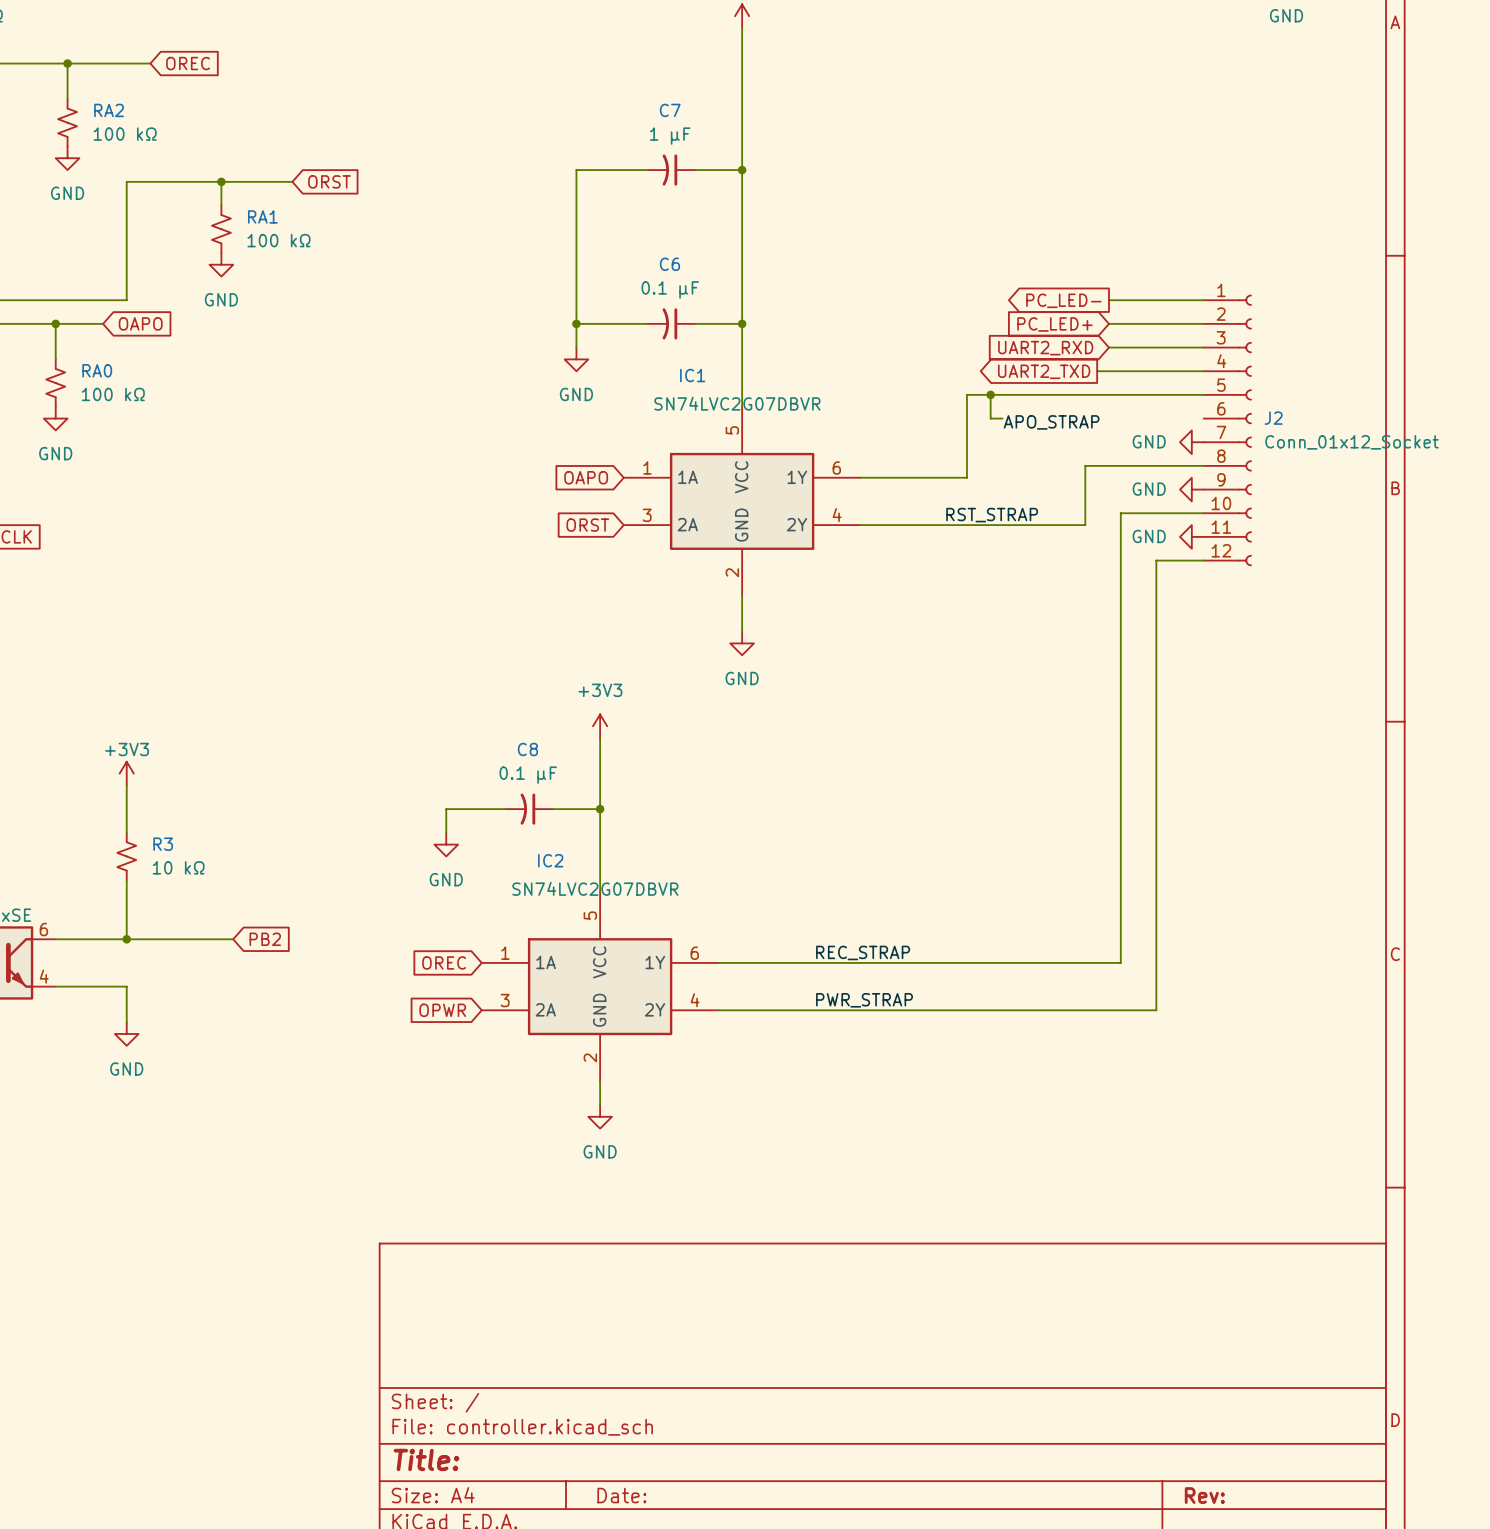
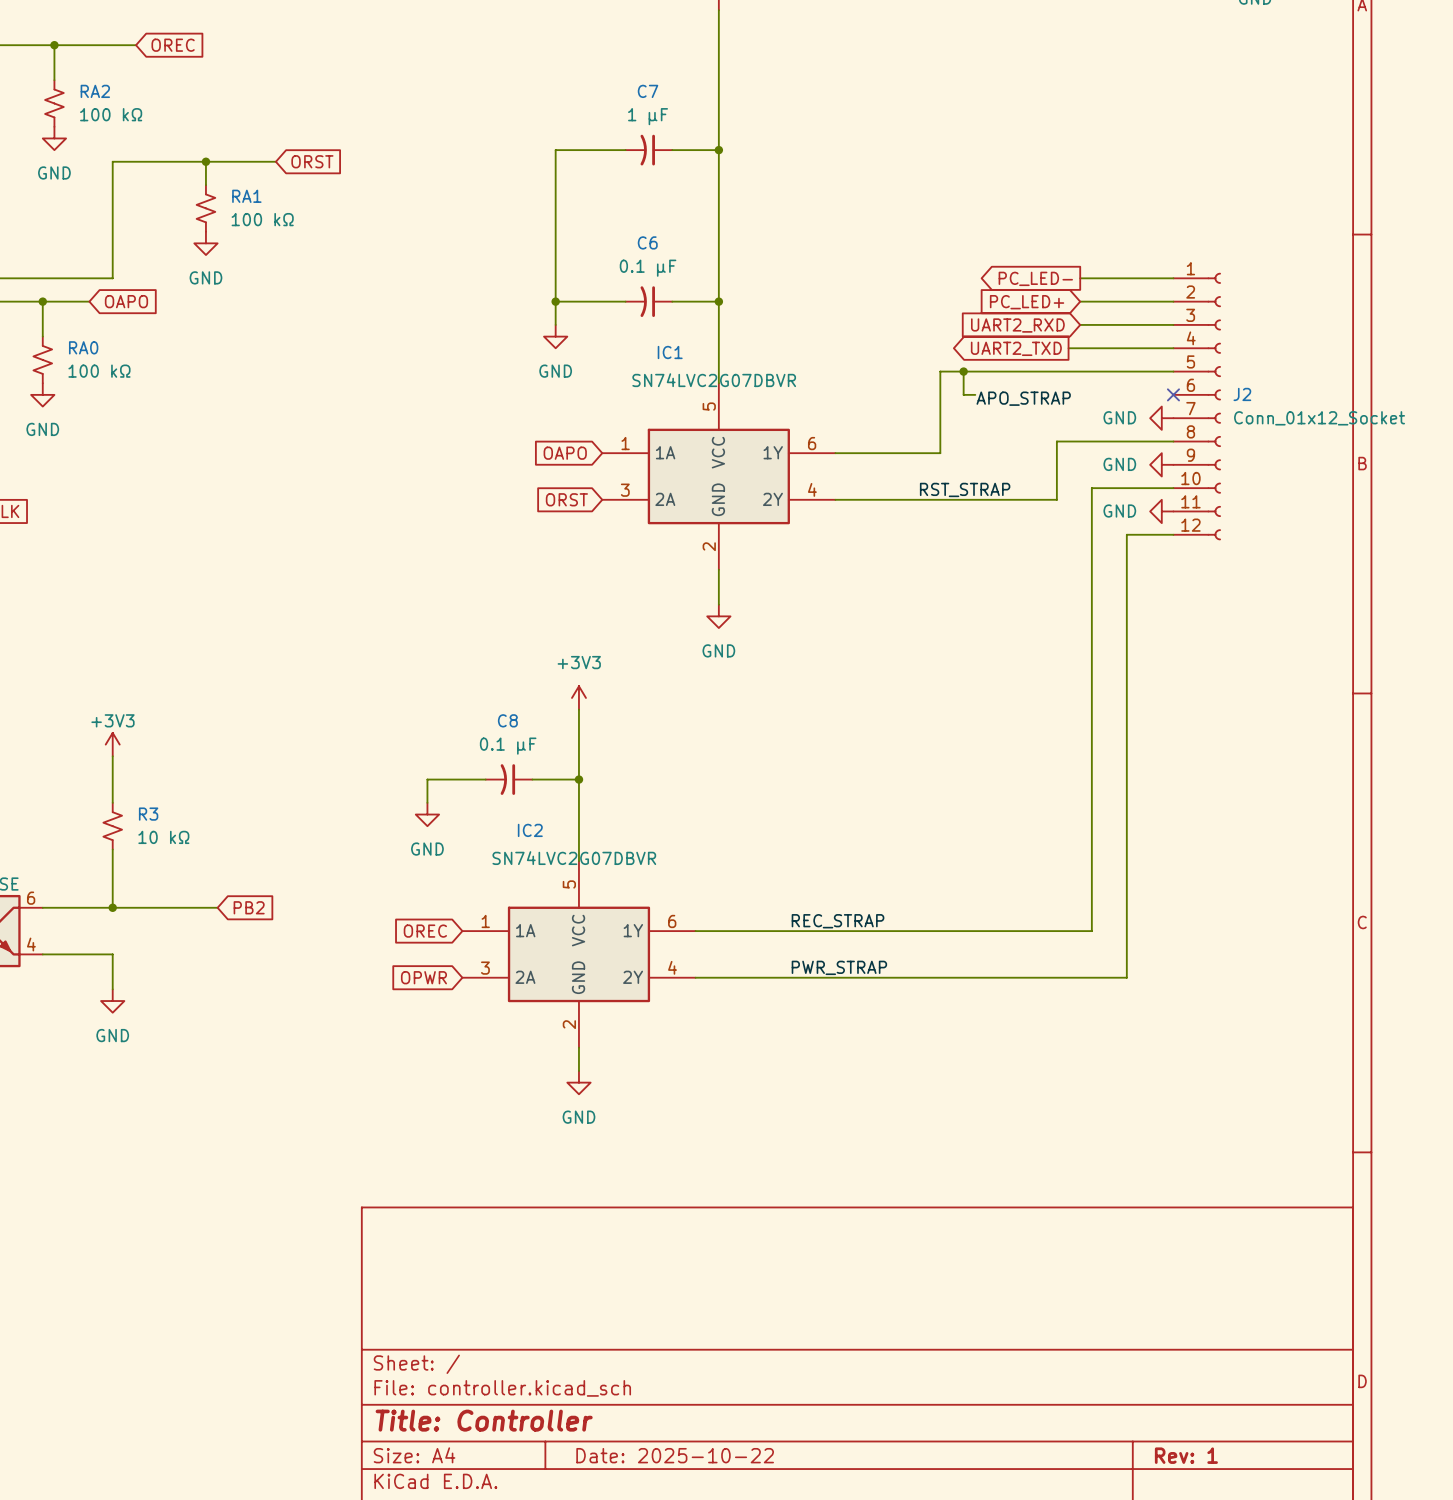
no-connect mark: none -> (1173, 394)
title block: Title: (426, 1459) -> Title: Controller (484, 1420)
title block: Date: (621, 1495) -> Date: 2025-10-22 (675, 1455)
title block: Rev: (1204, 1495) -> Rev: 1 (1186, 1455)

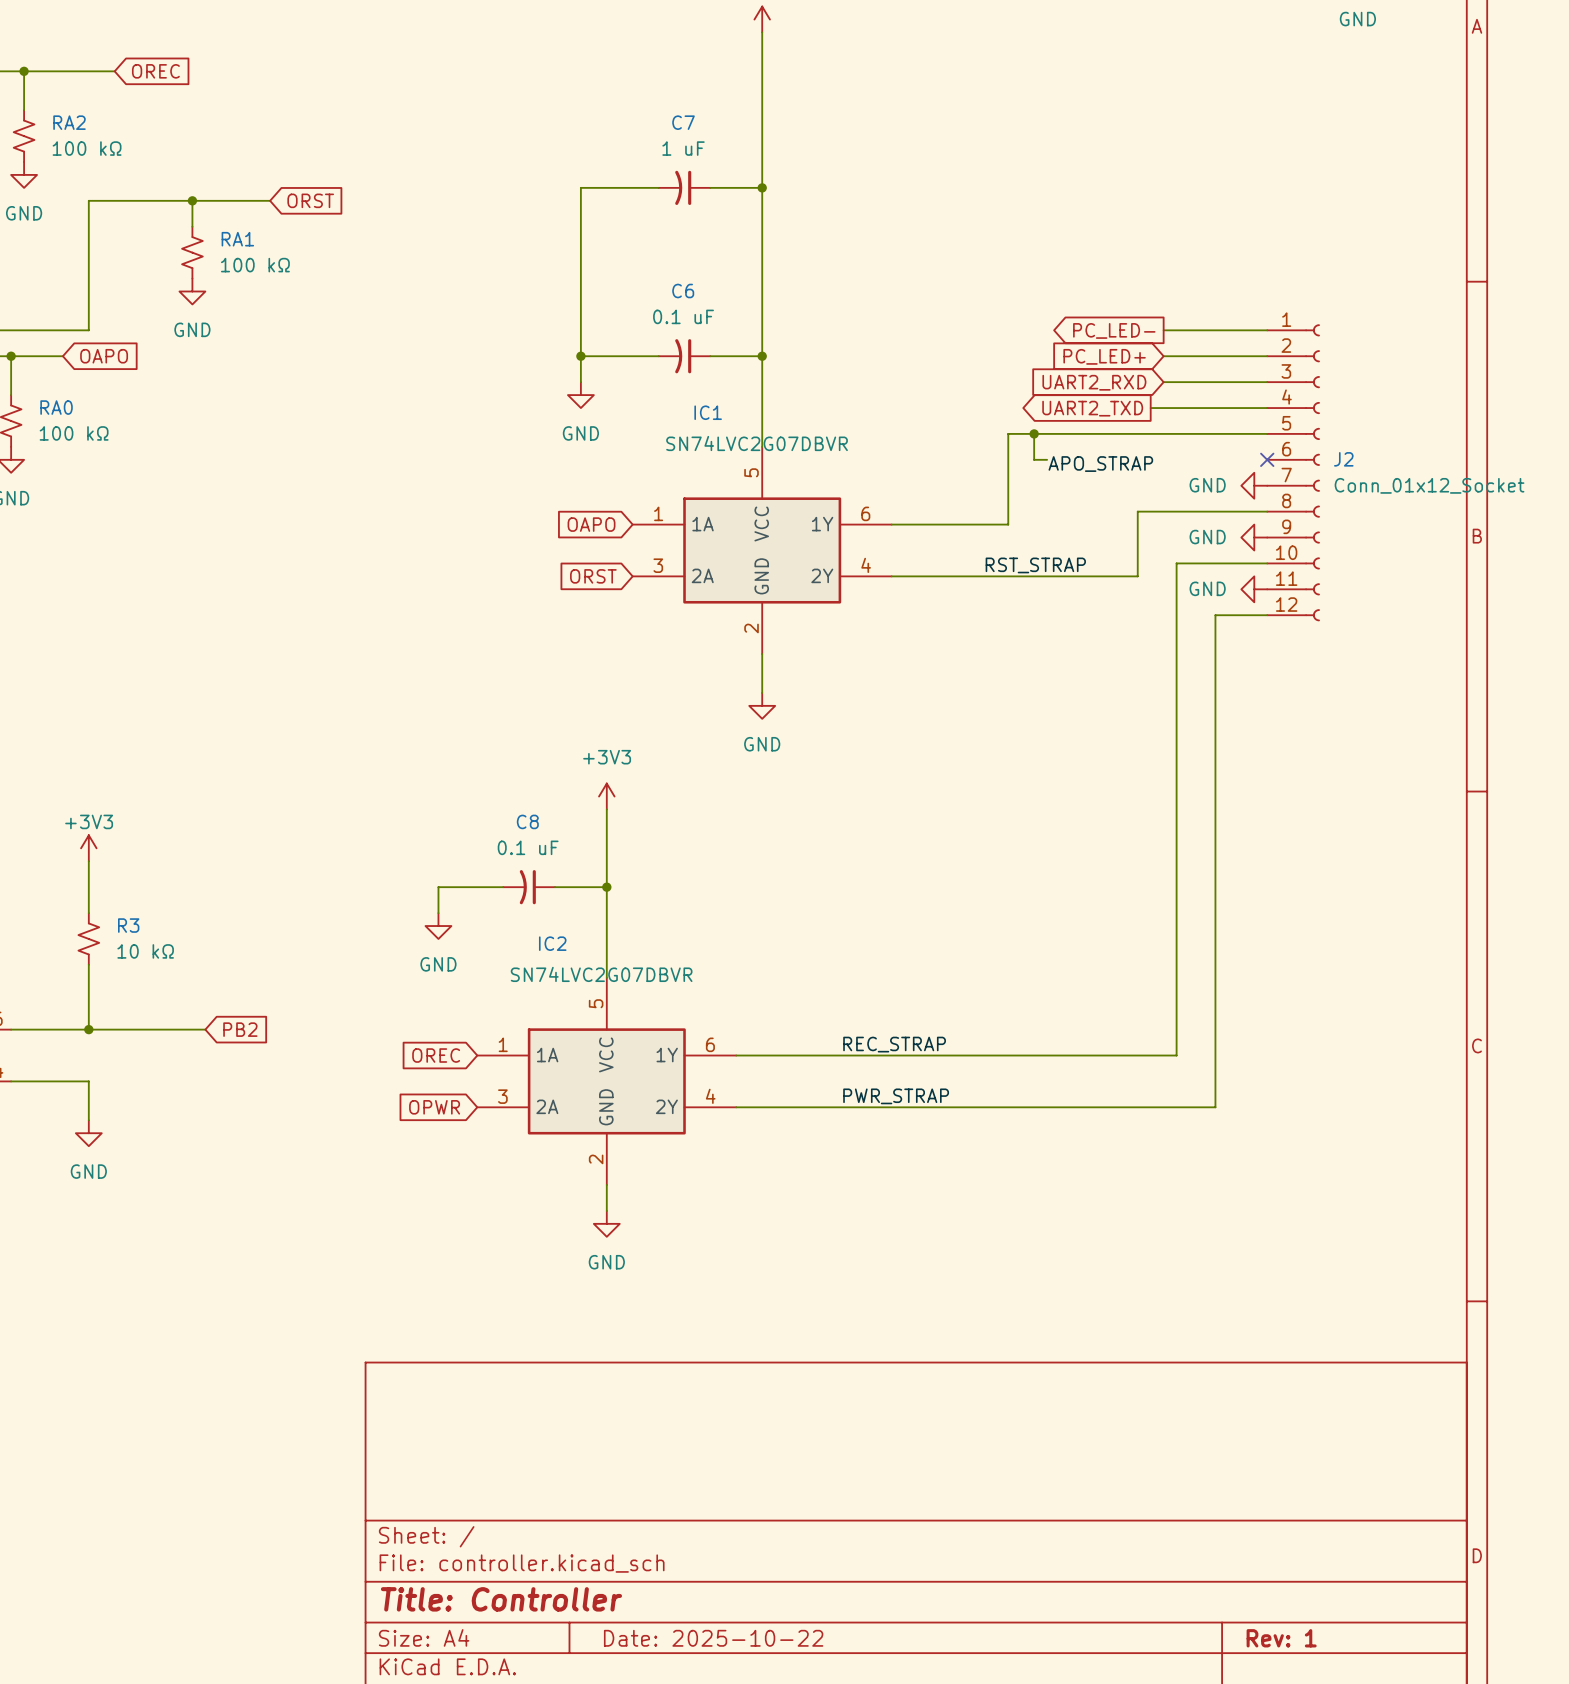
C7 value: 1 µF (648, 116) -> 1 uF (683, 148)
C6 value: 0.1 µF (648, 268) -> 0.1 uF (683, 316)
C8 value: 0.1 µF (508, 746) -> 0.1 uF (528, 847)

